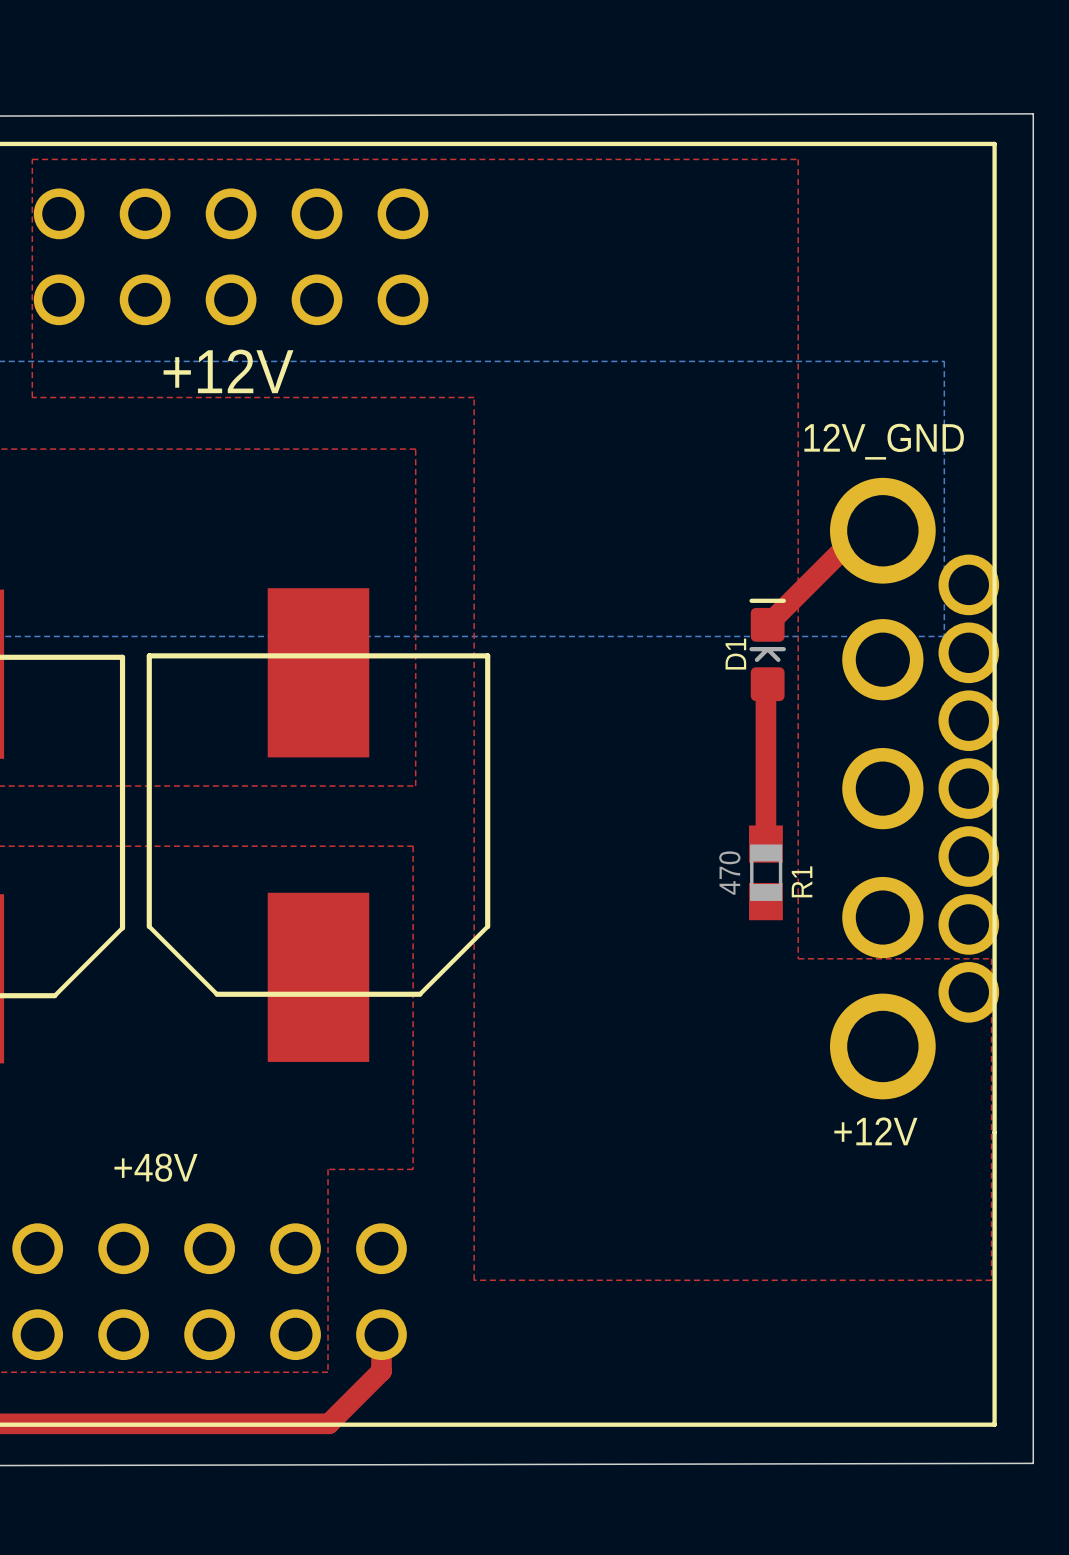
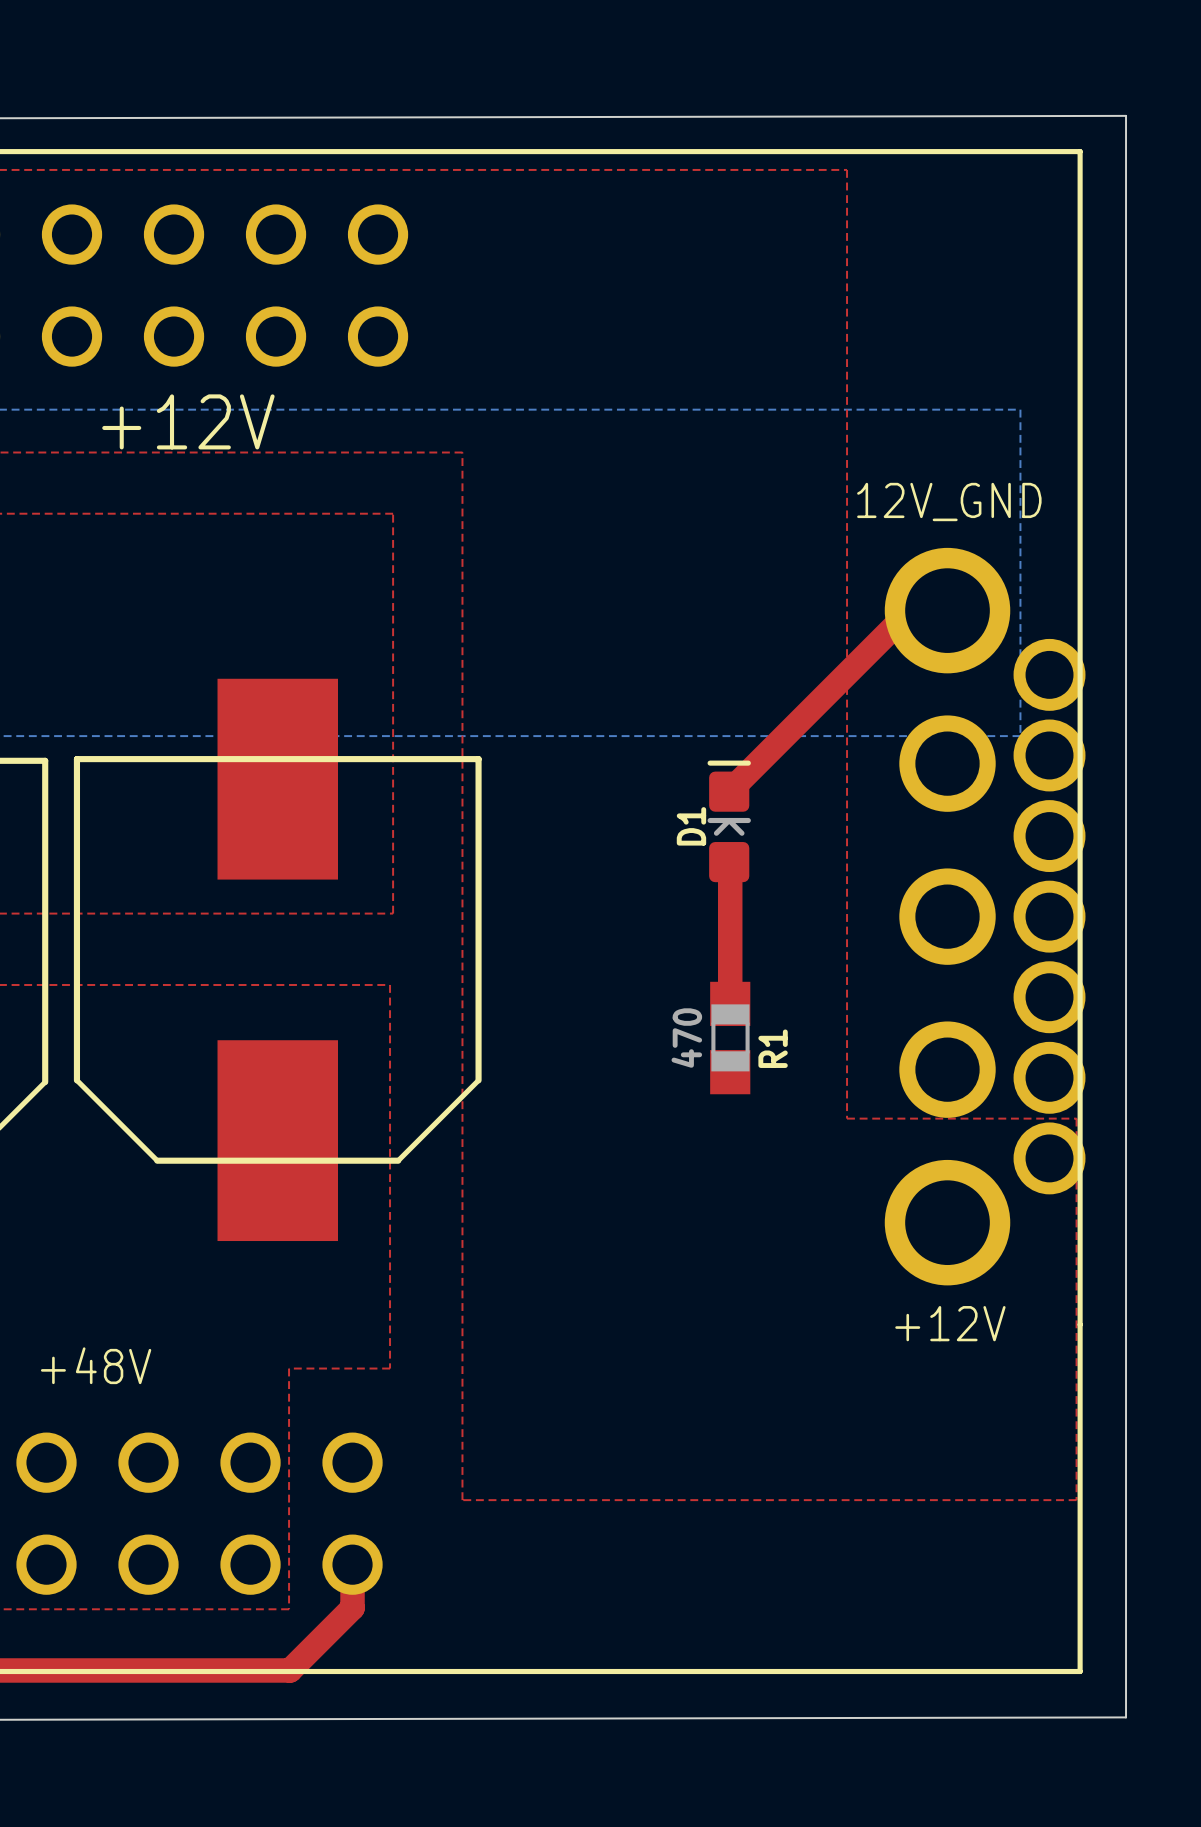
top track: (861, 530) (767, 624) -> (922, 610) (910, 610) (729, 791)
D1 position: (767, 649) -> (729, 821)
top track: (767, 684) (765, 685) (765, 844) -> none
top track: none -> (729, 862) (730, 1003)
R1 position: (765, 872) -> (730, 1038)

